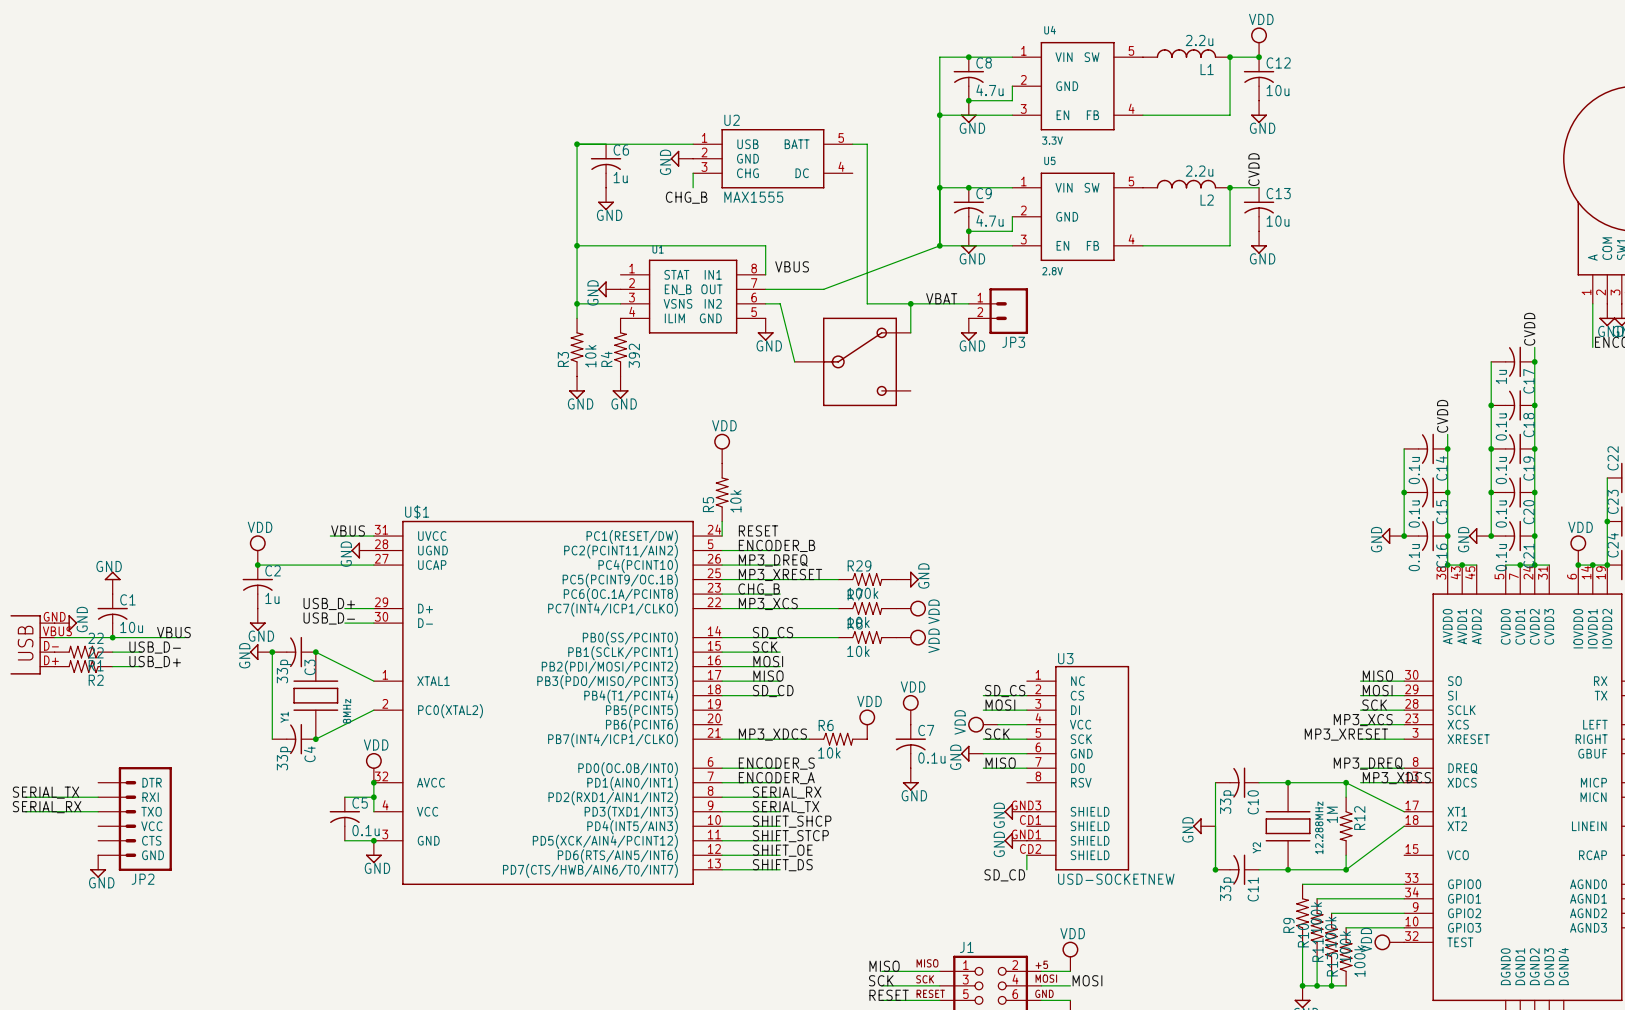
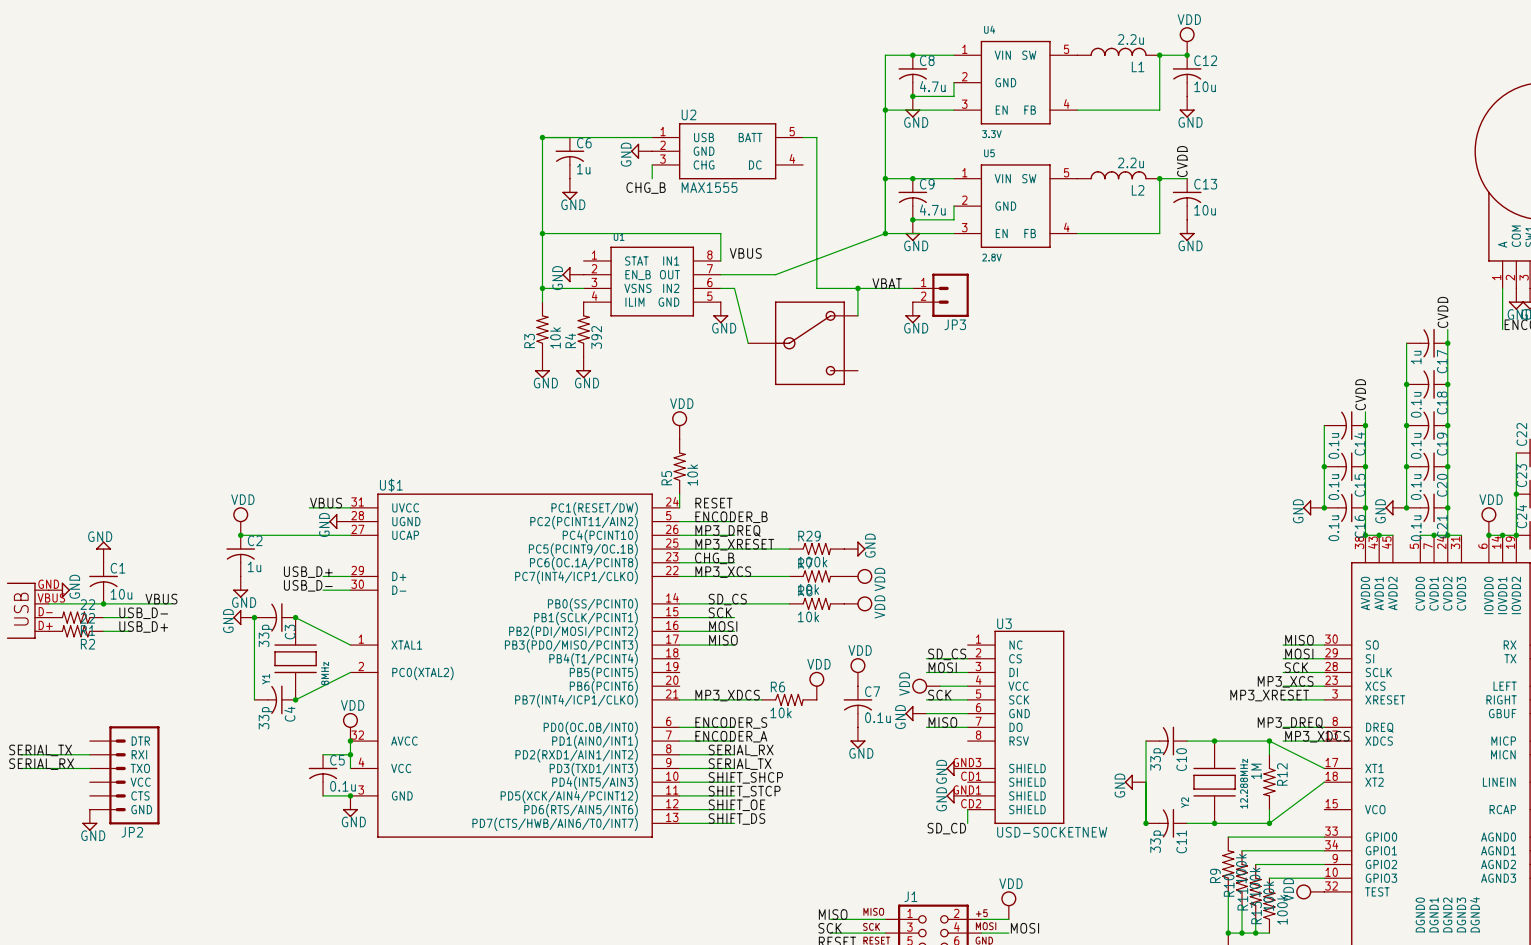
label: SD_CD (773, 691) -> none
wire: (722, 695) (780, 695) -> none

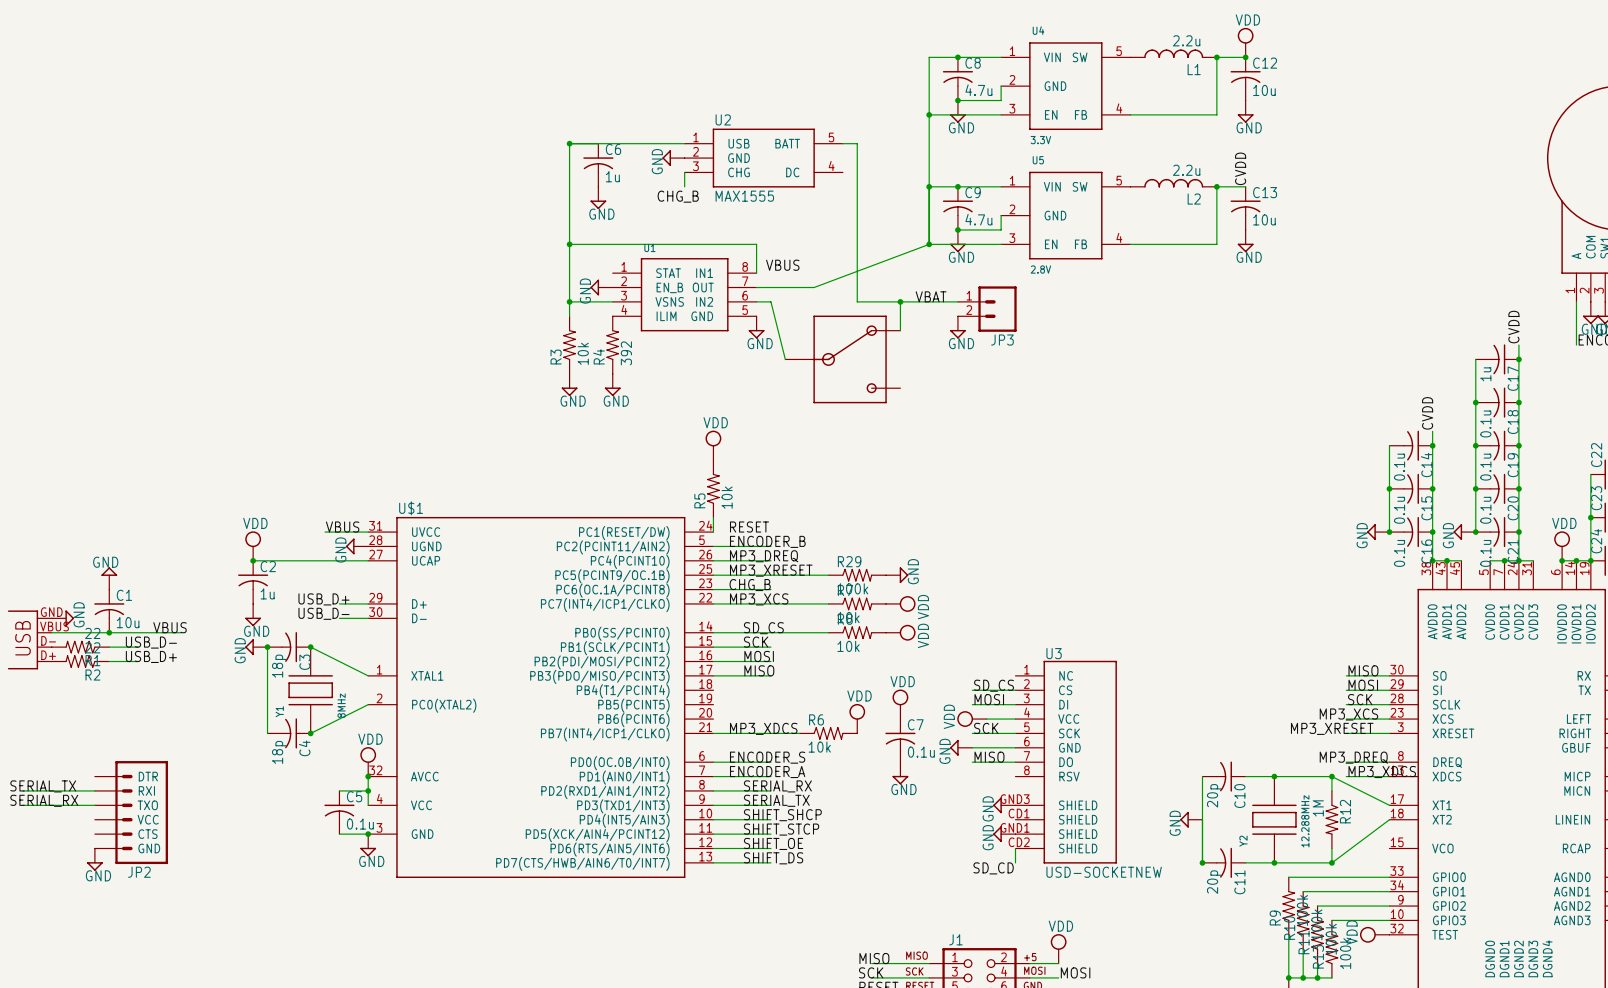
C3 value: 33p (265, 635) -> 18p (279, 666)
C4 value: 33p (265, 718) -> 18p (279, 752)
C10 value: 33p (1157, 759) -> 20p (1214, 795)
C11 value: 33p (1157, 841) -> 20p (1214, 882)

